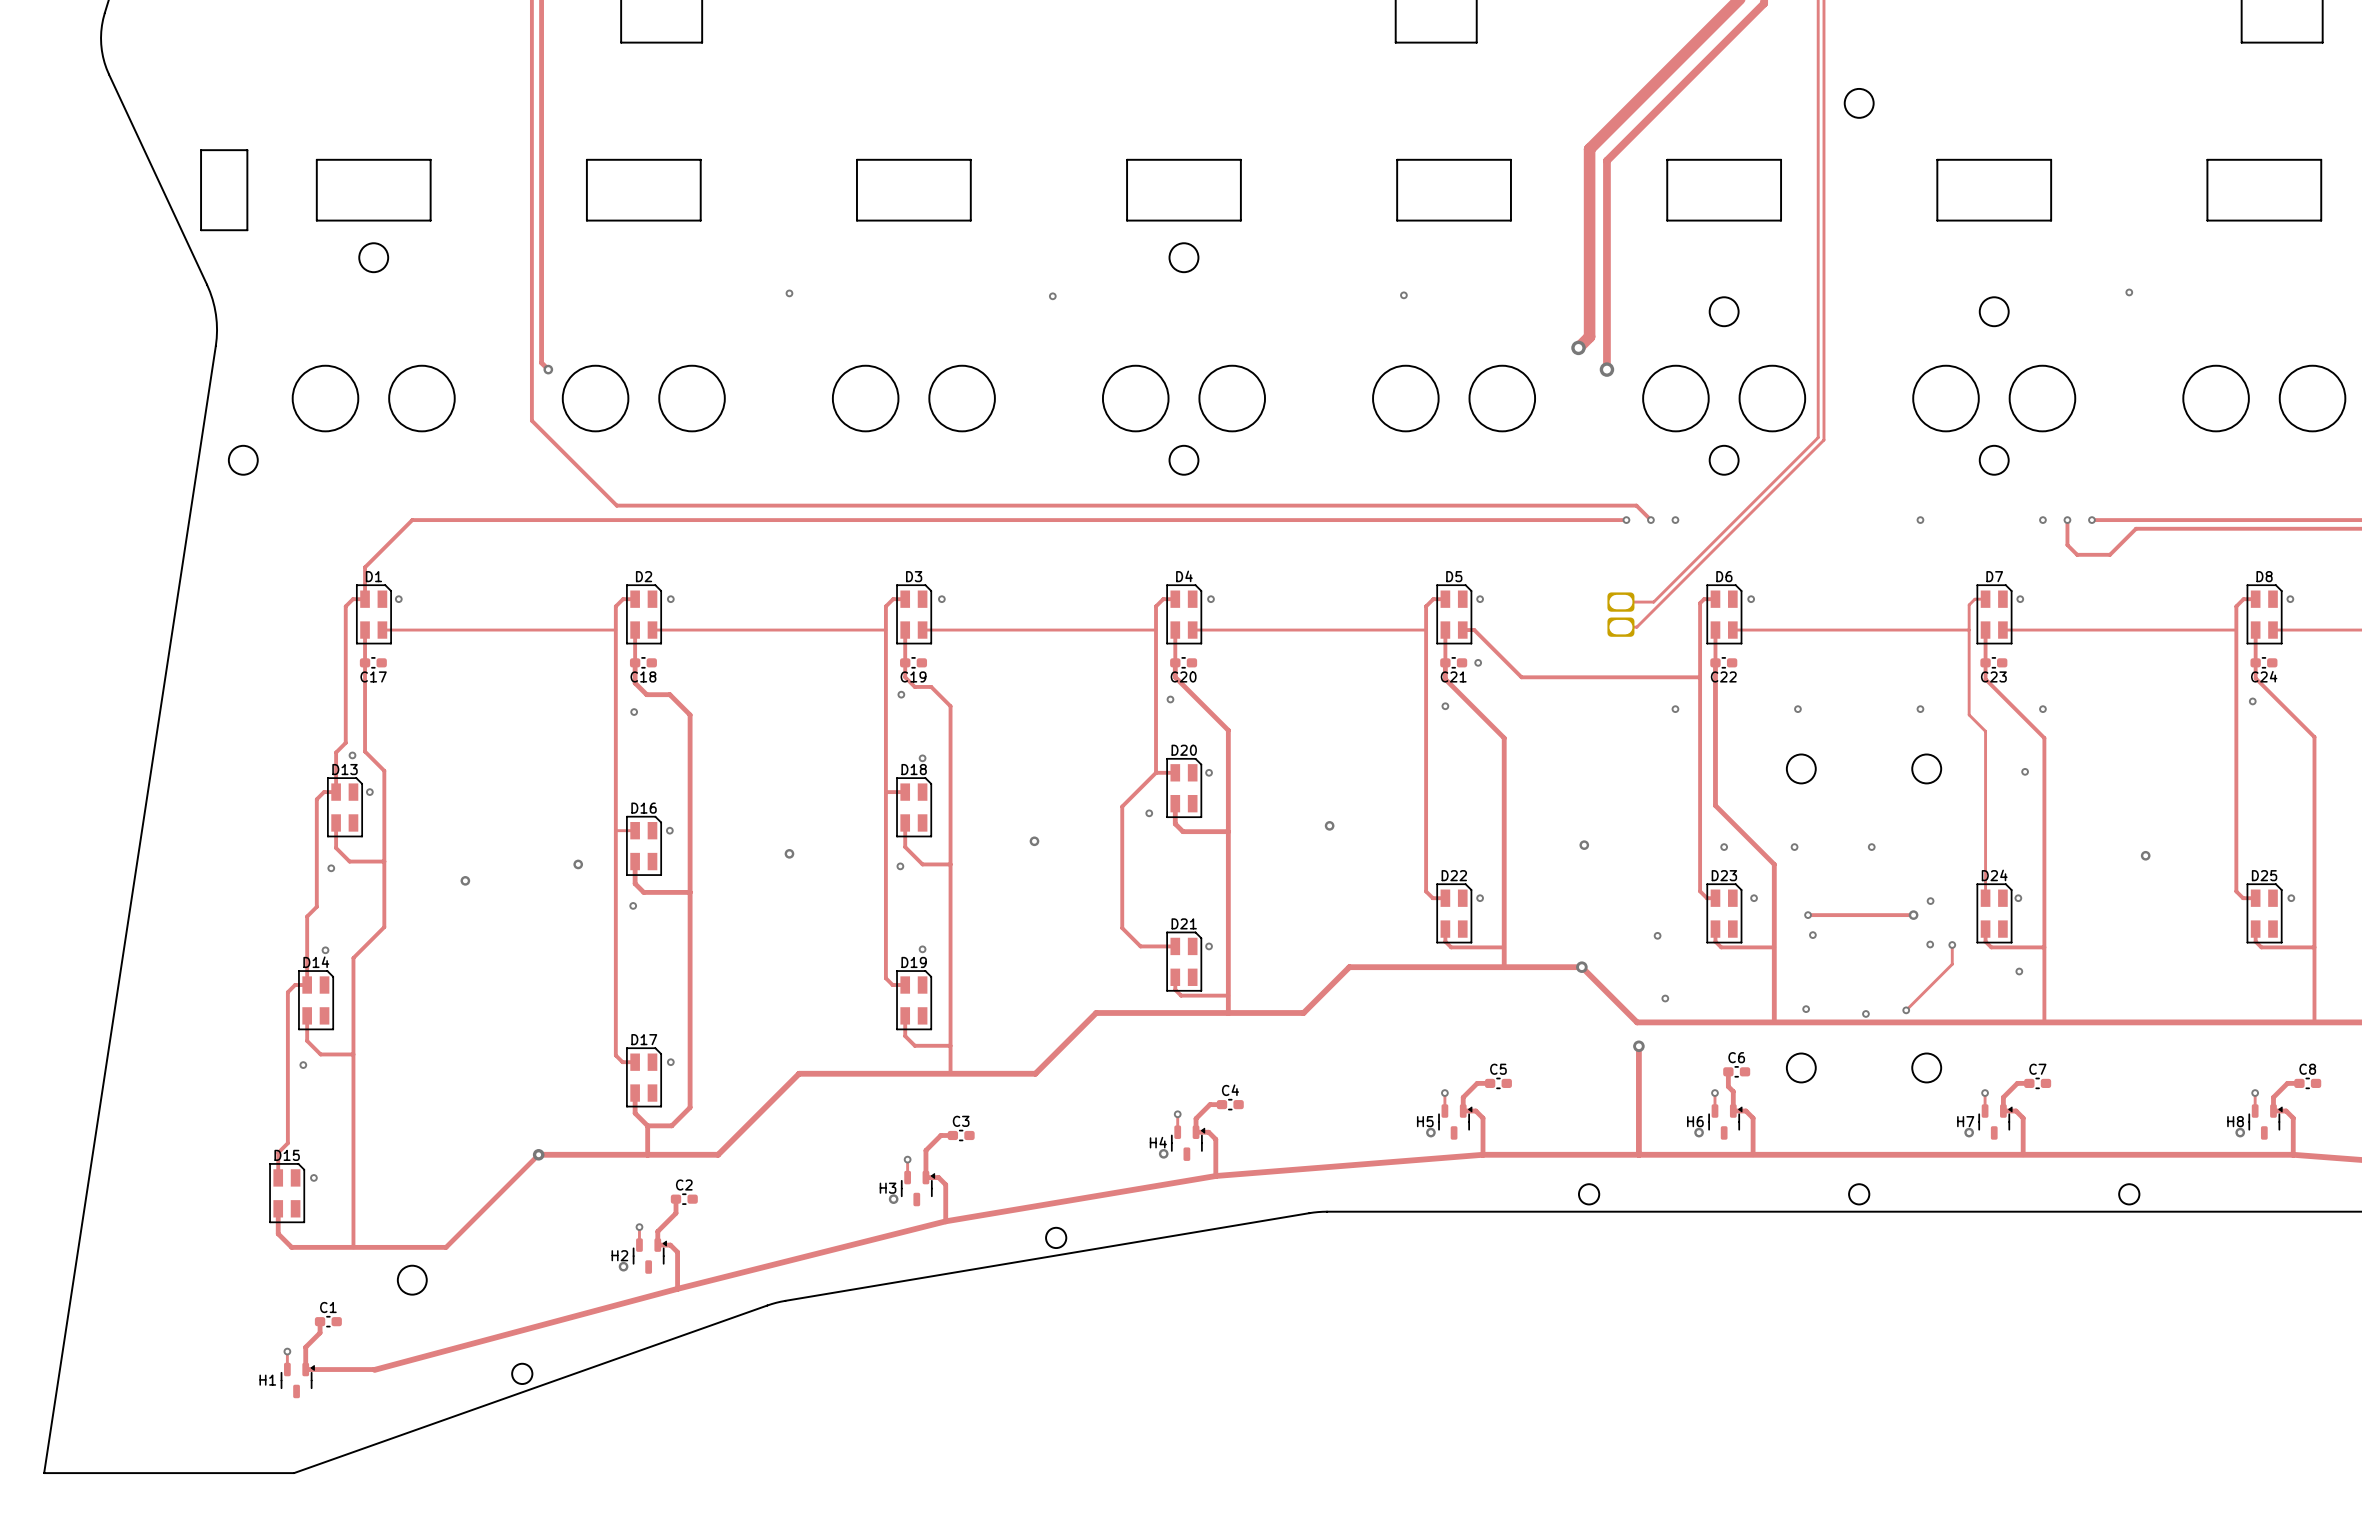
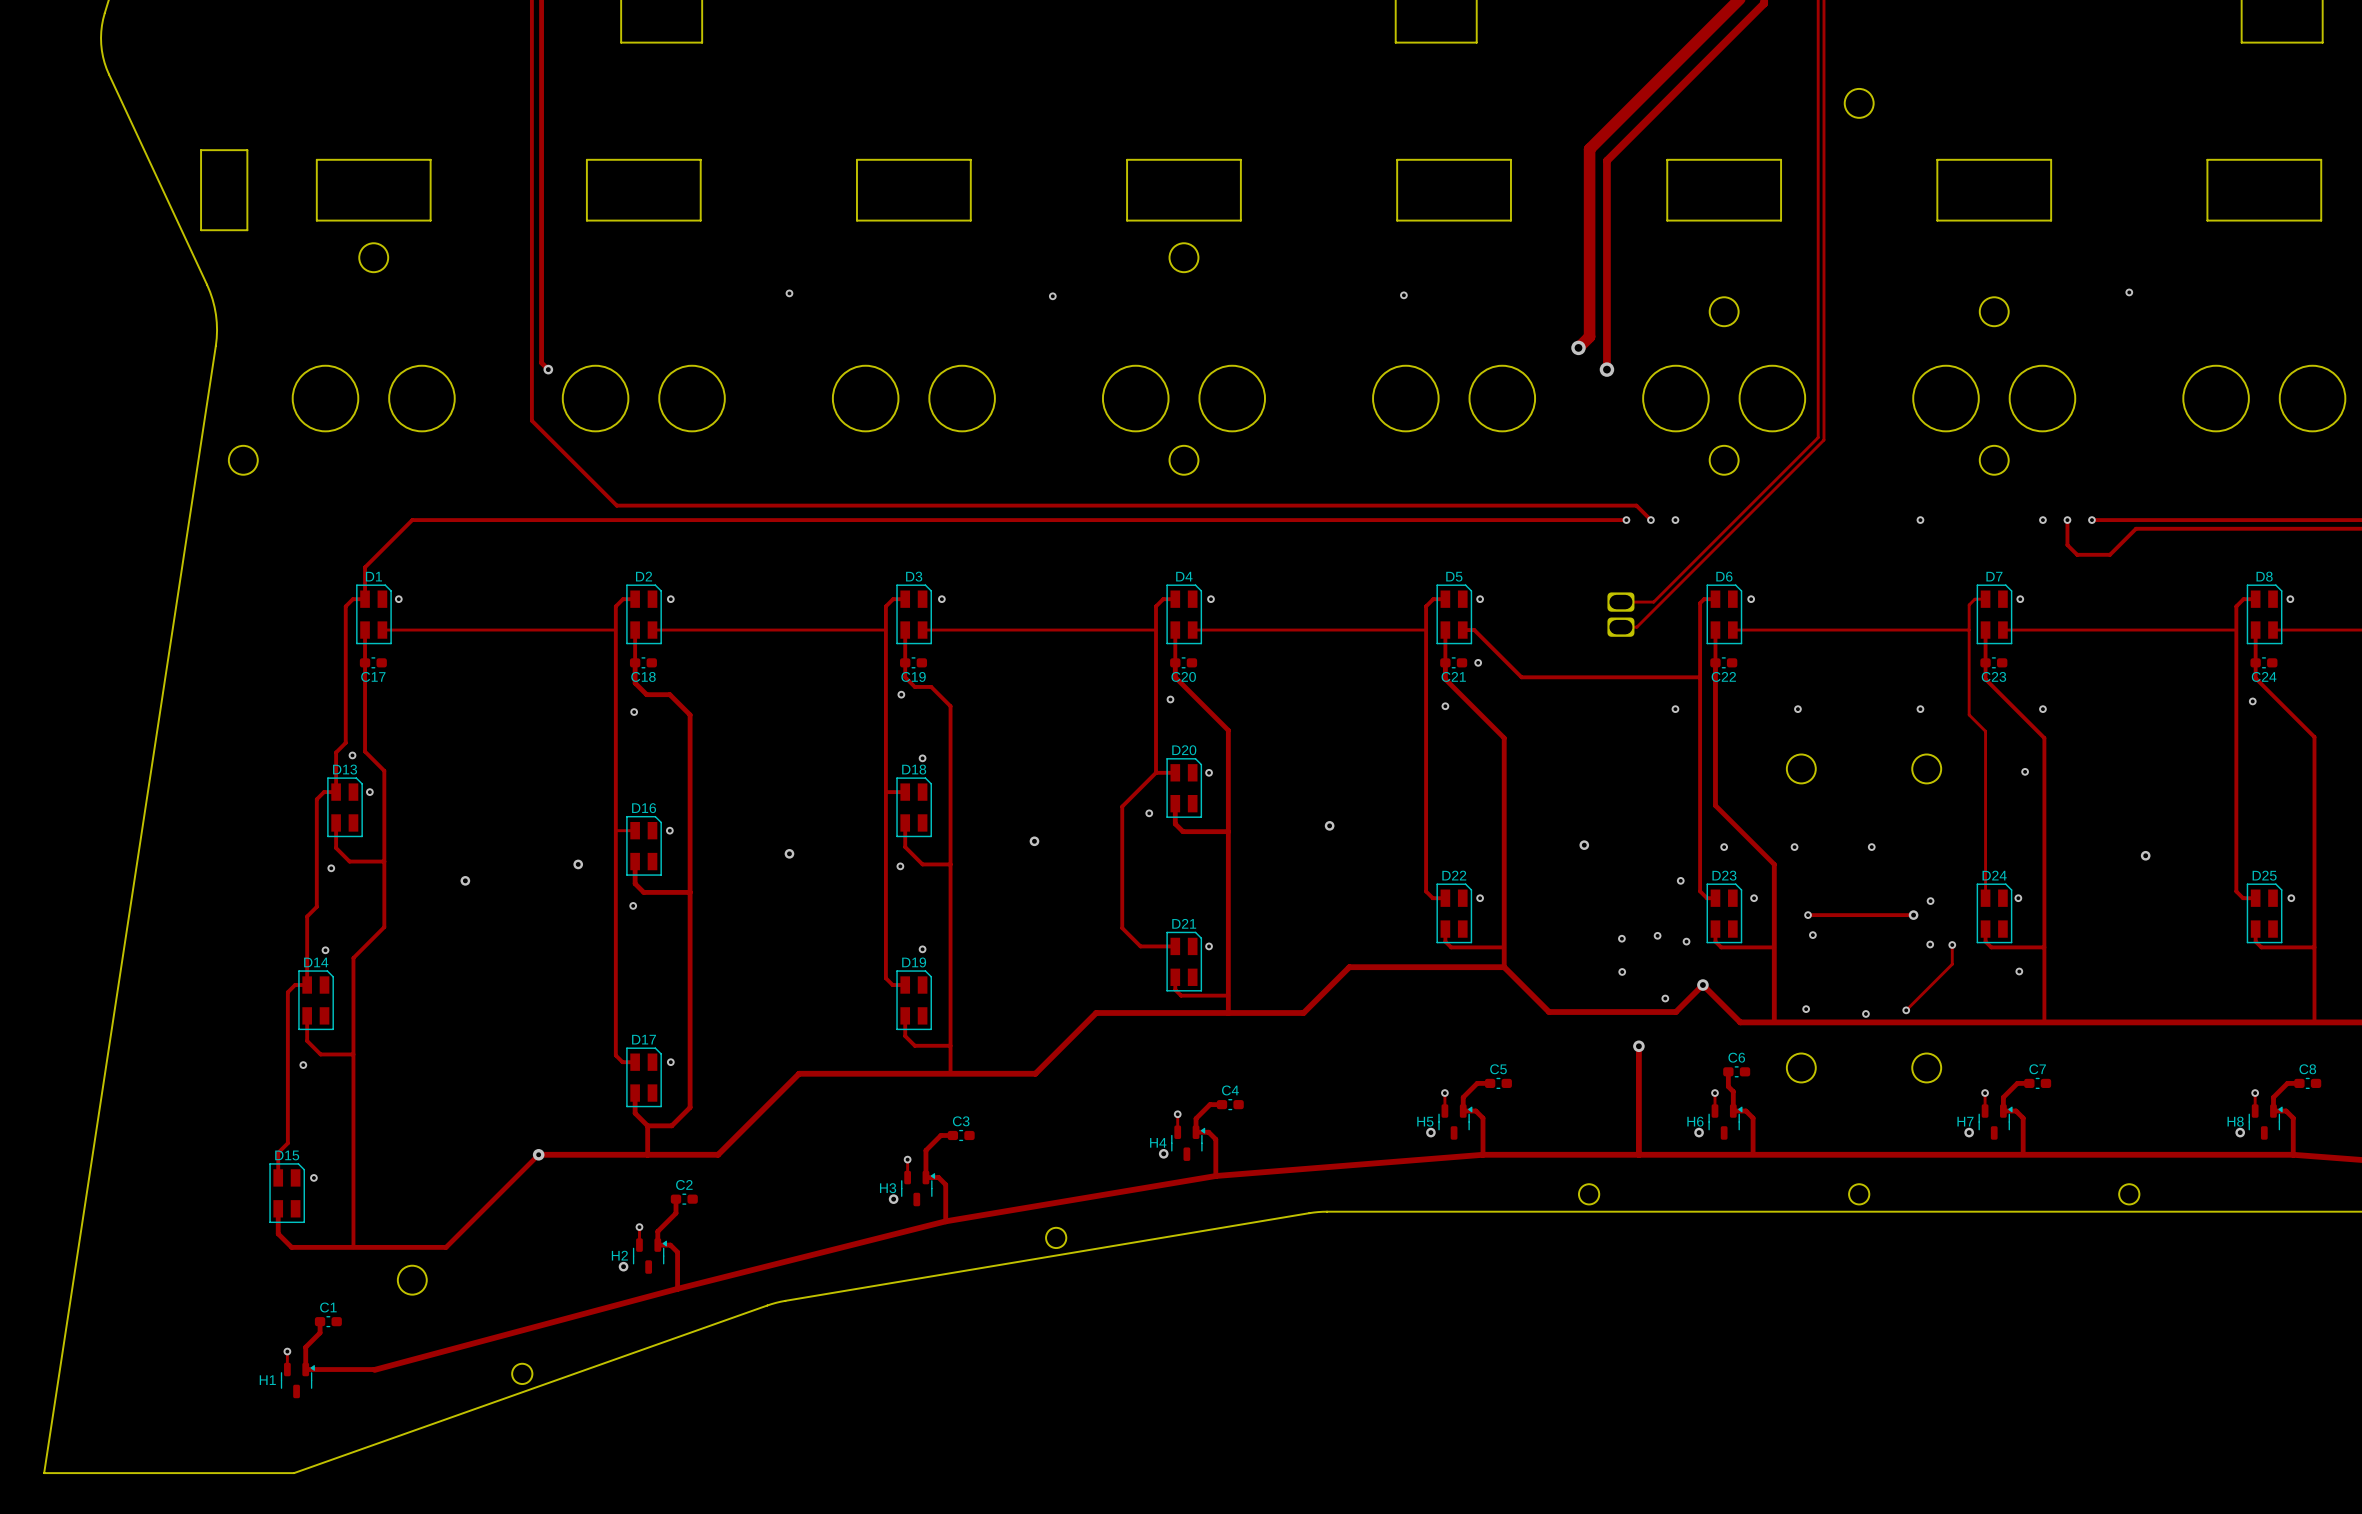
via: none -> (1680, 880)
via: none -> (1621, 938)
via: none -> (1686, 941)
track: (1504, 967) (1581, 967) (1637, 1022) (1740, 1022) -> (1504, 967) (1549, 1012) (1675, 1012) (1702, 985) (1740, 1022)
via: (1581, 967) -> none
via: none -> (1622, 971)
via: none -> (1702, 985)

